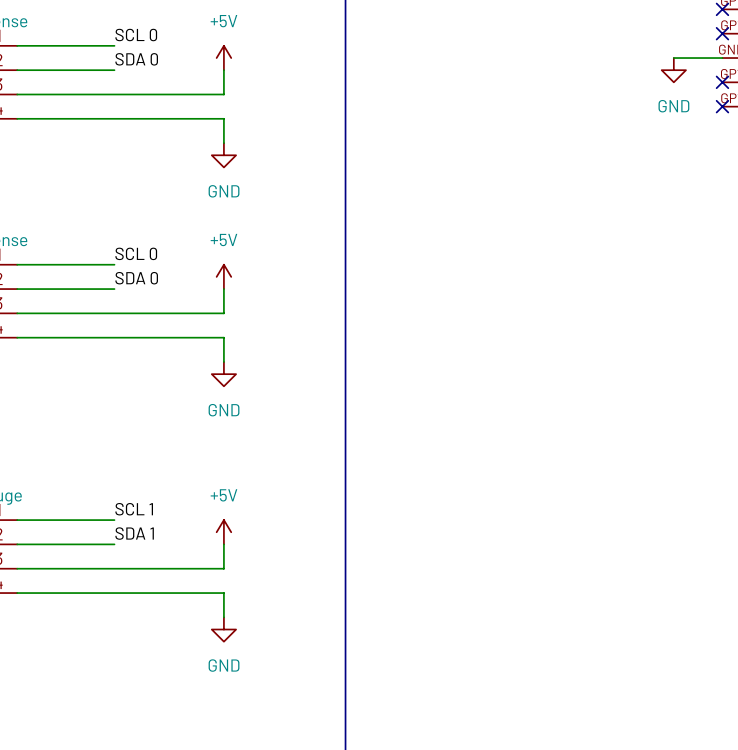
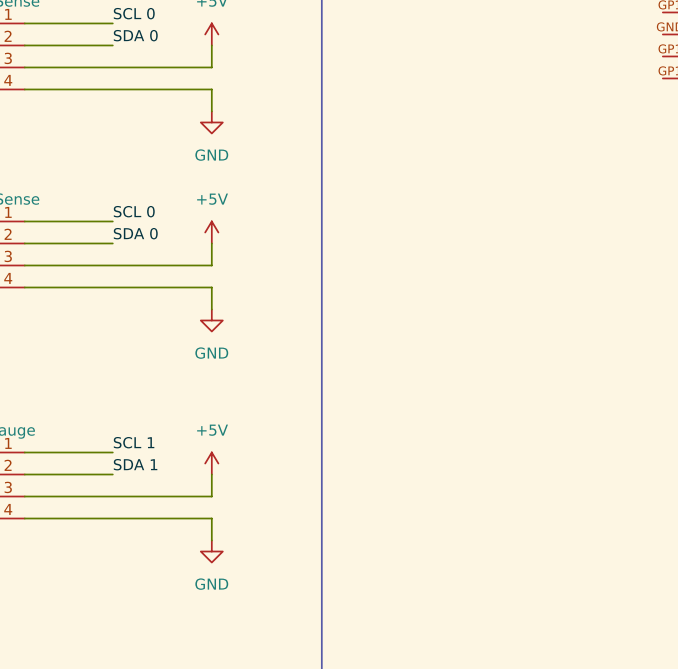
no-connect mark: (722, 33) -> none
wire: (673, 58) (722, 58) -> none
power symbol: GND (673, 70) -> none
no-connect mark: (722, 82) -> none
no-connect mark: (722, 106) -> none

